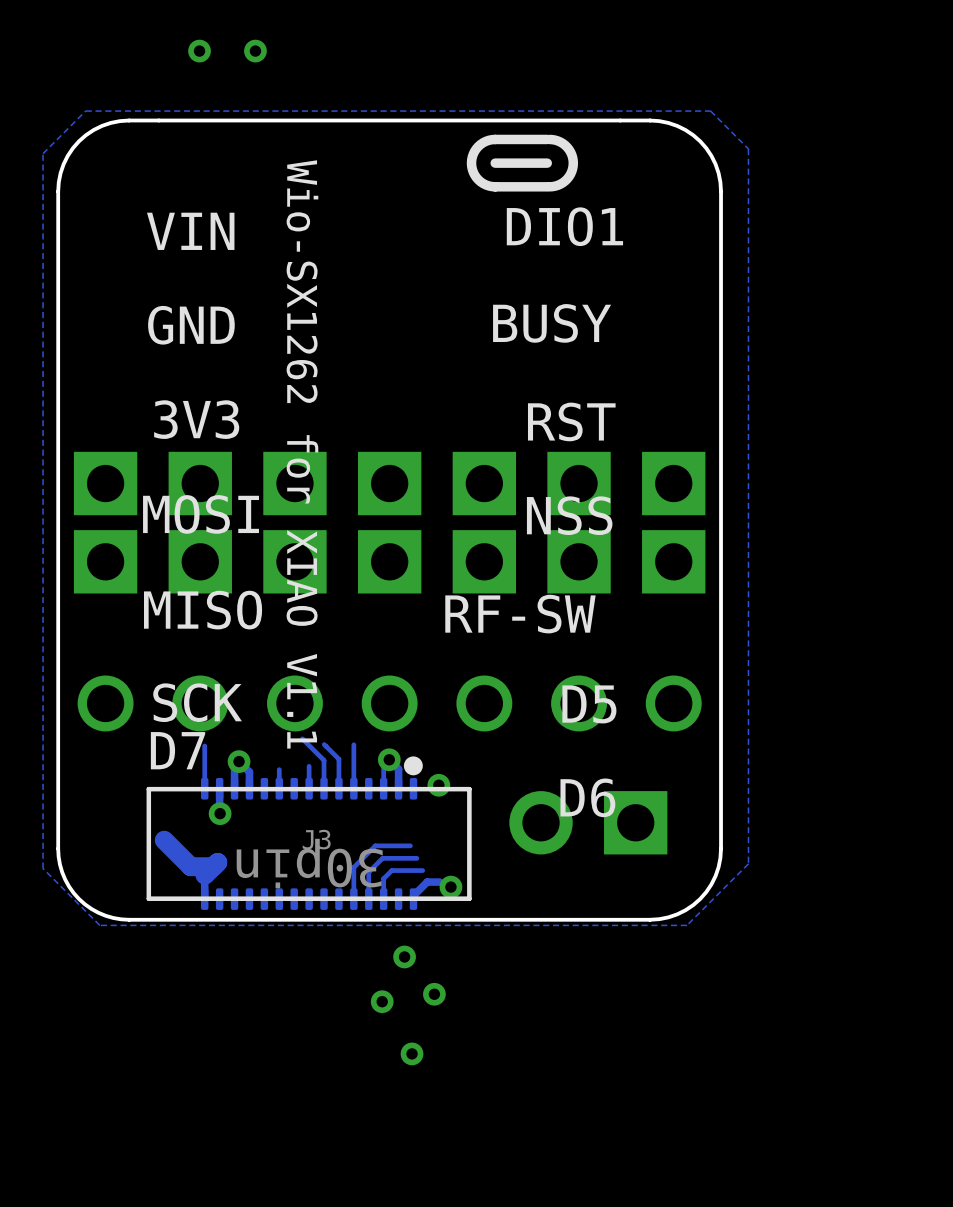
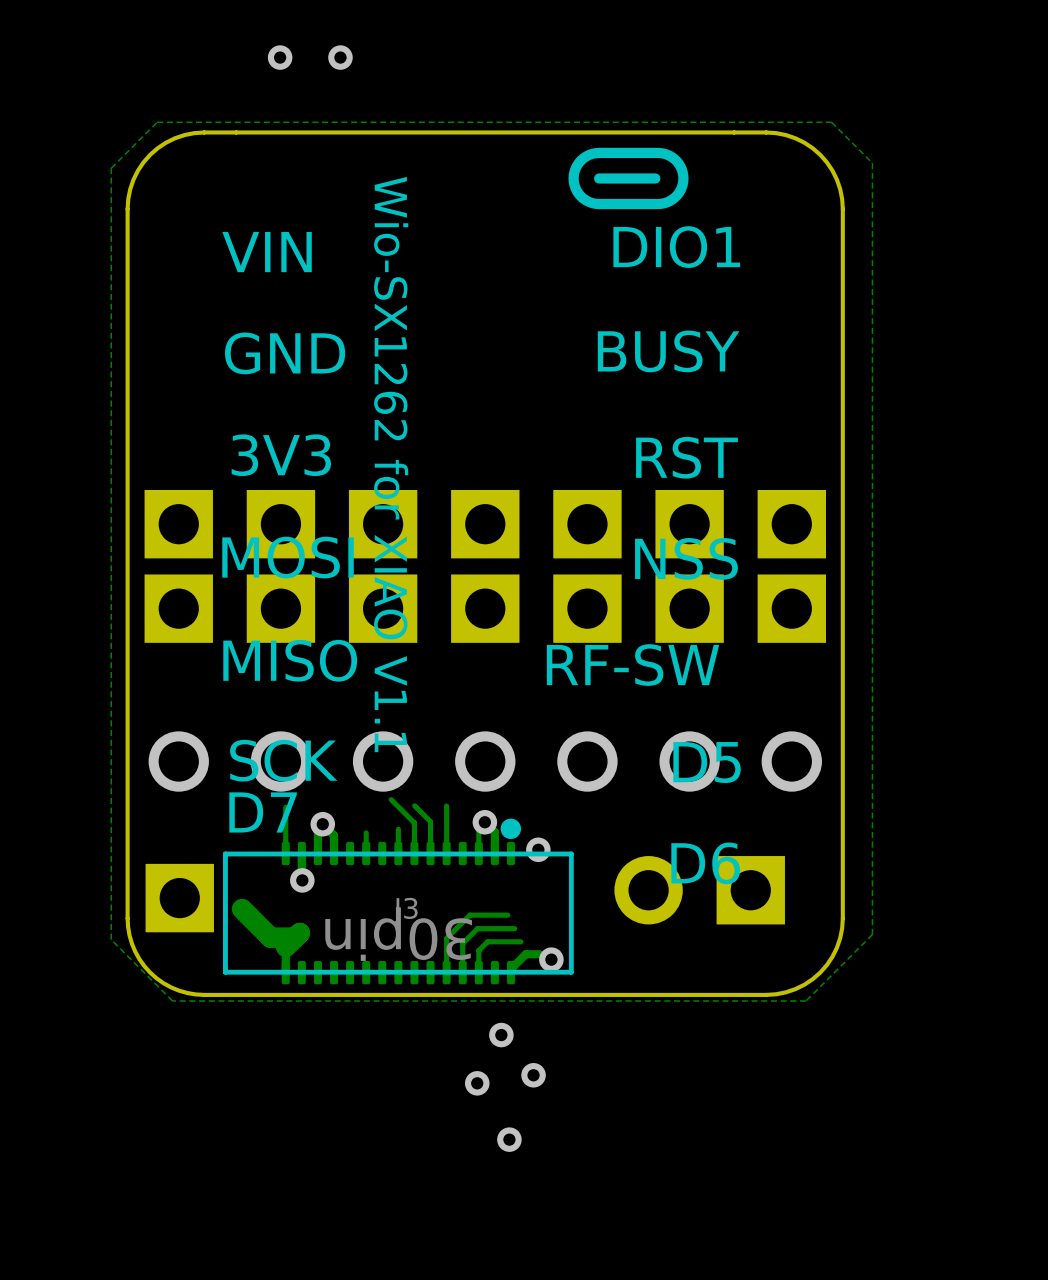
part: none -> (179, 898)

